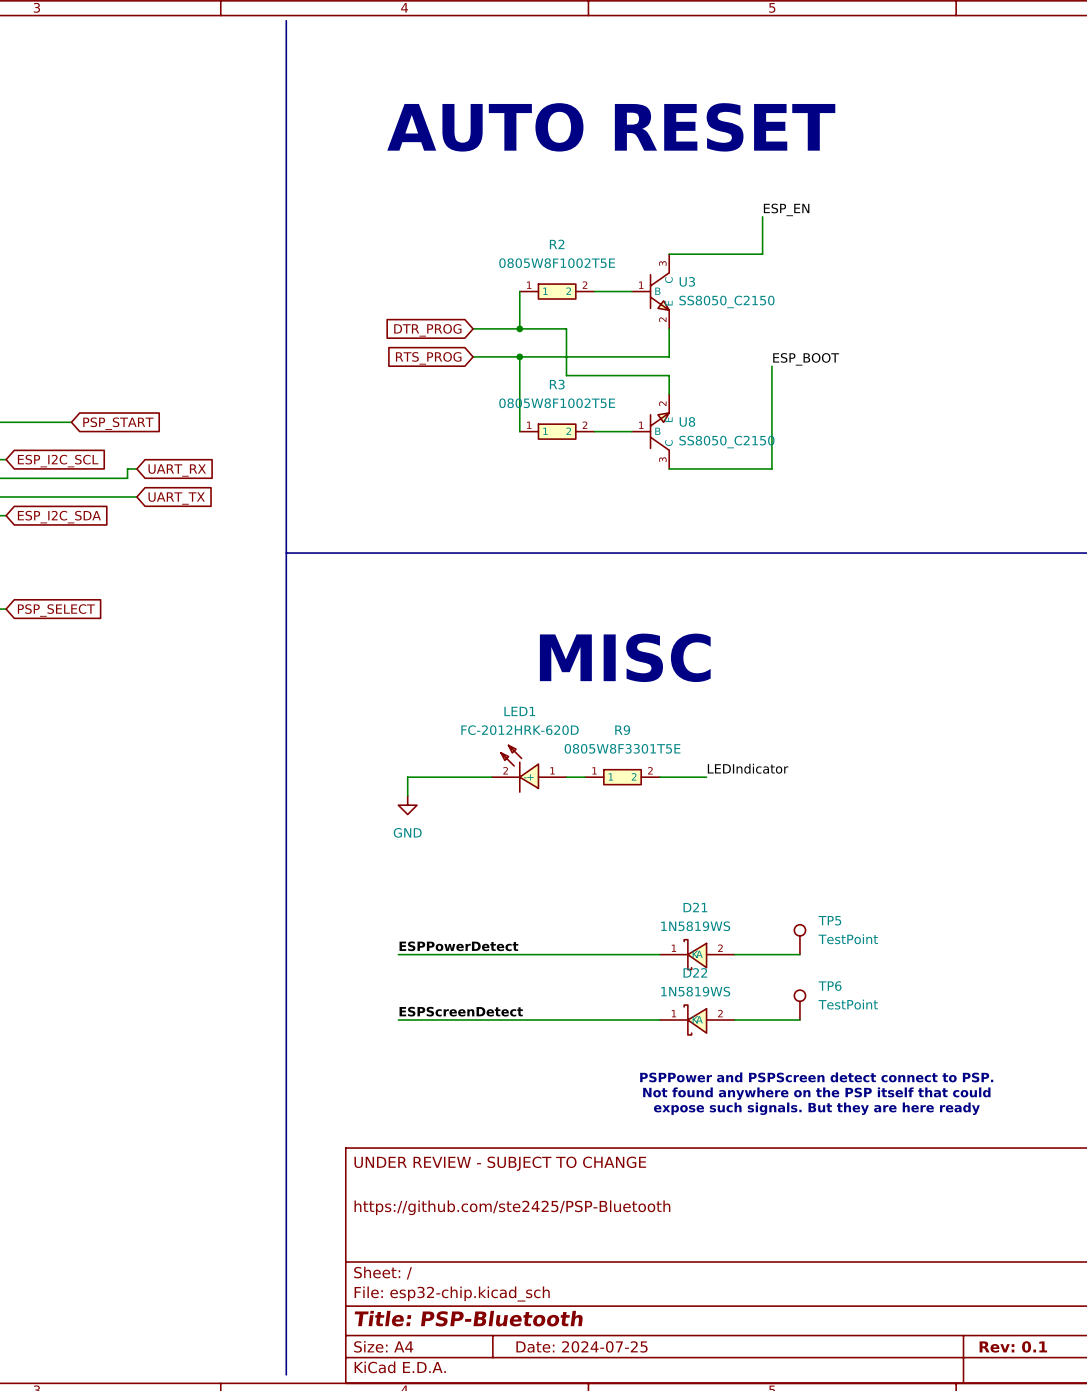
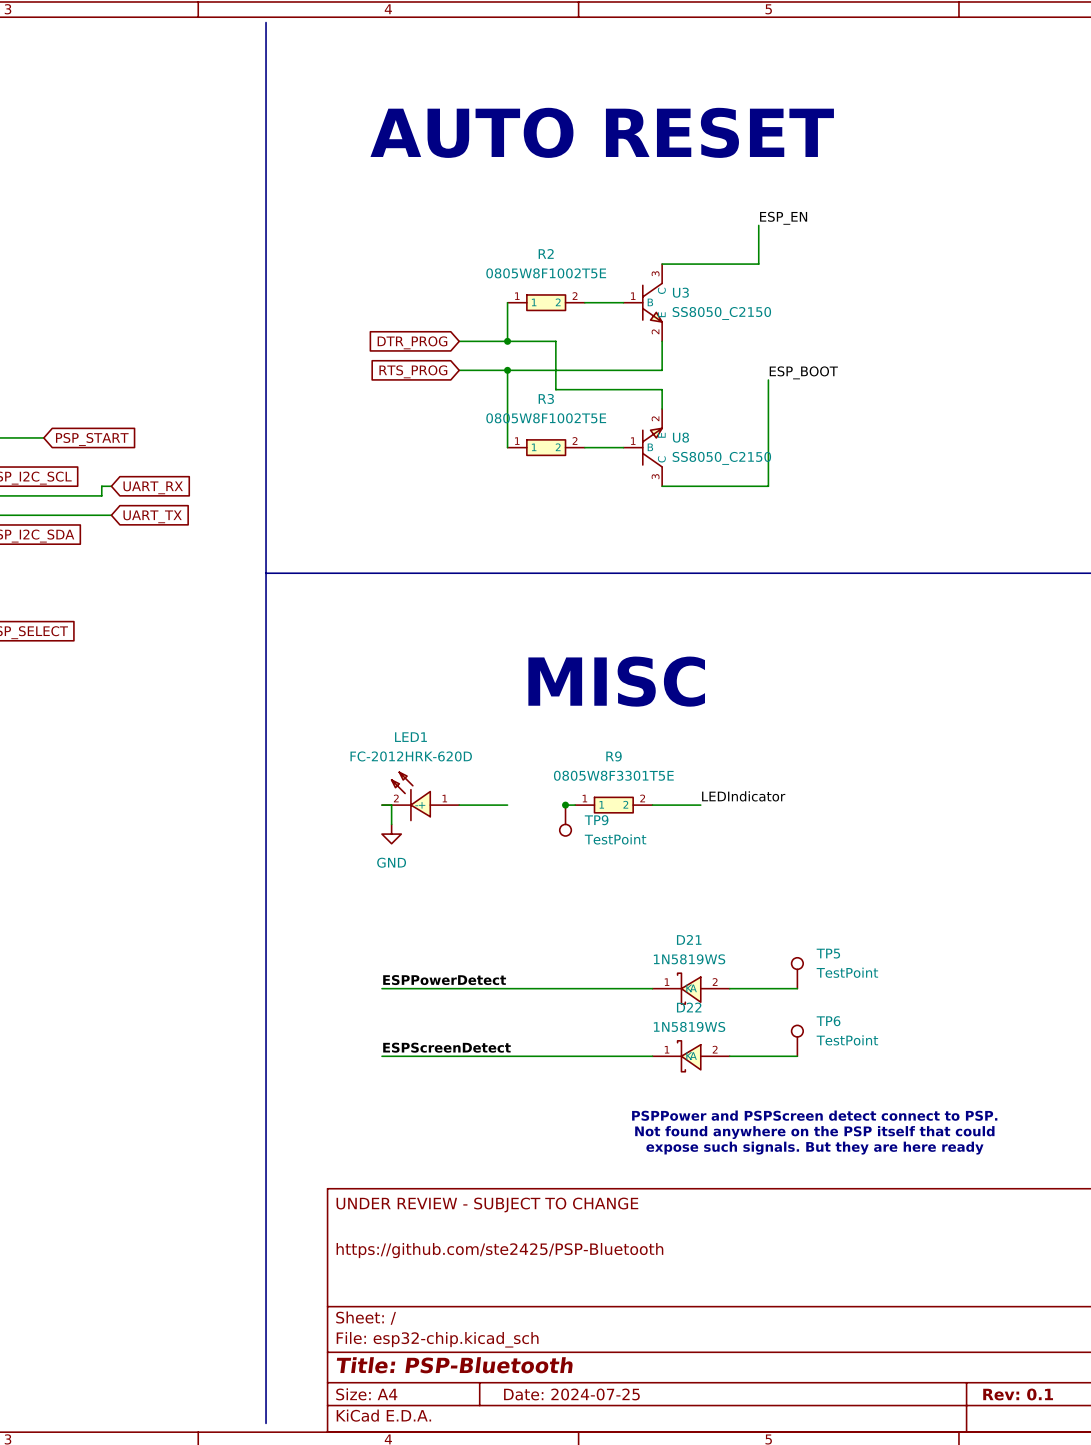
LED1 position: (529, 768) -> (420, 796)
wire: (566, 777) (575, 777) -> none
junction: none -> (565, 805)
TP9: none -> TestPoint (565, 820)

